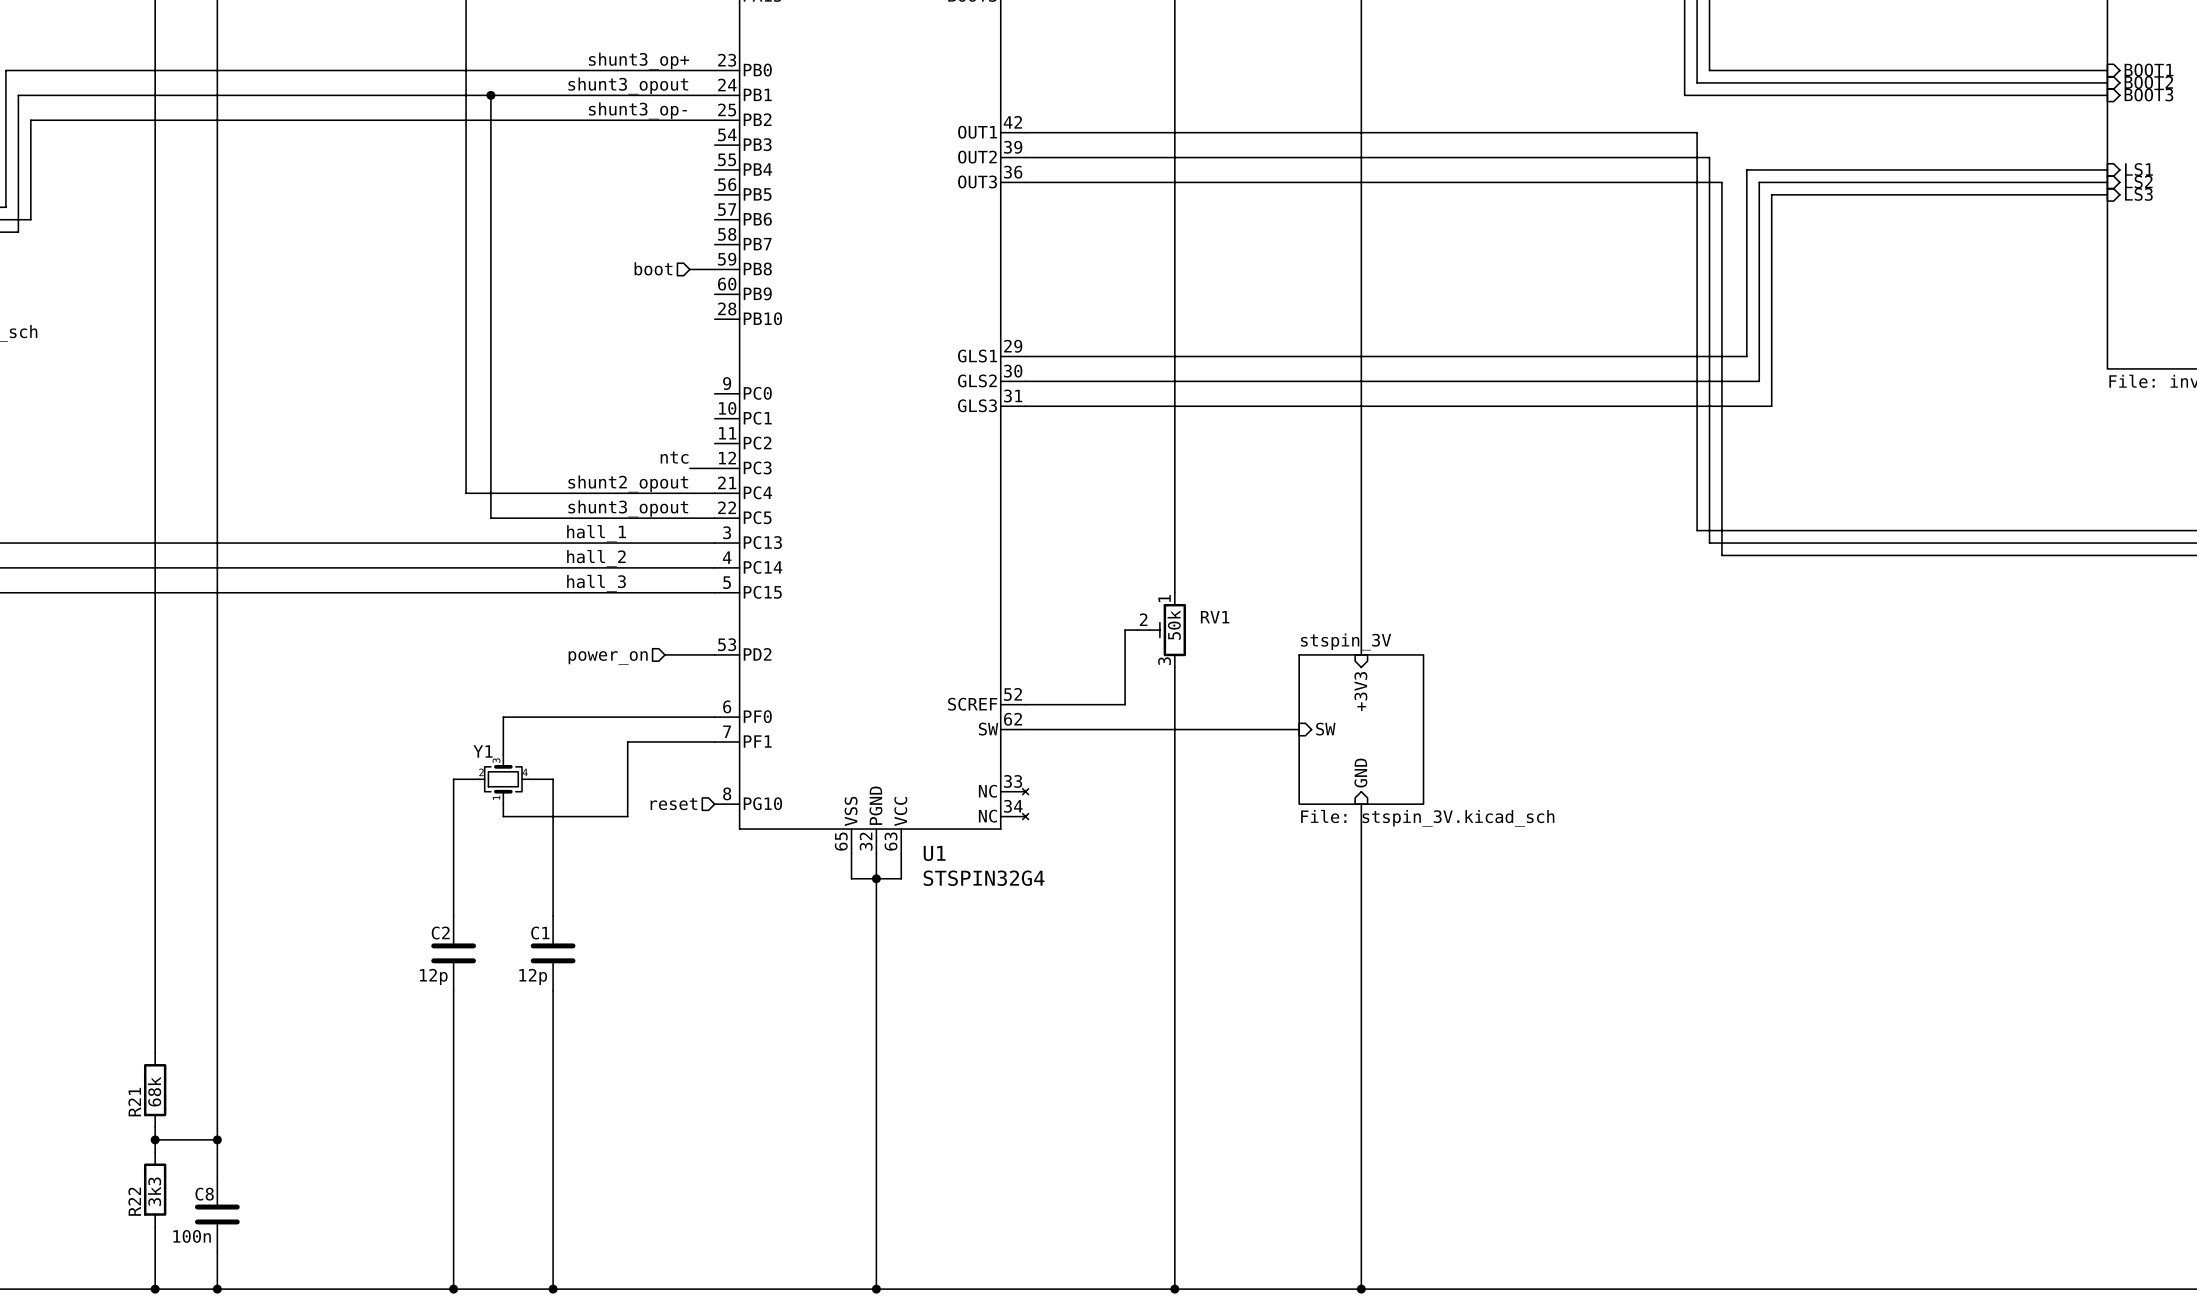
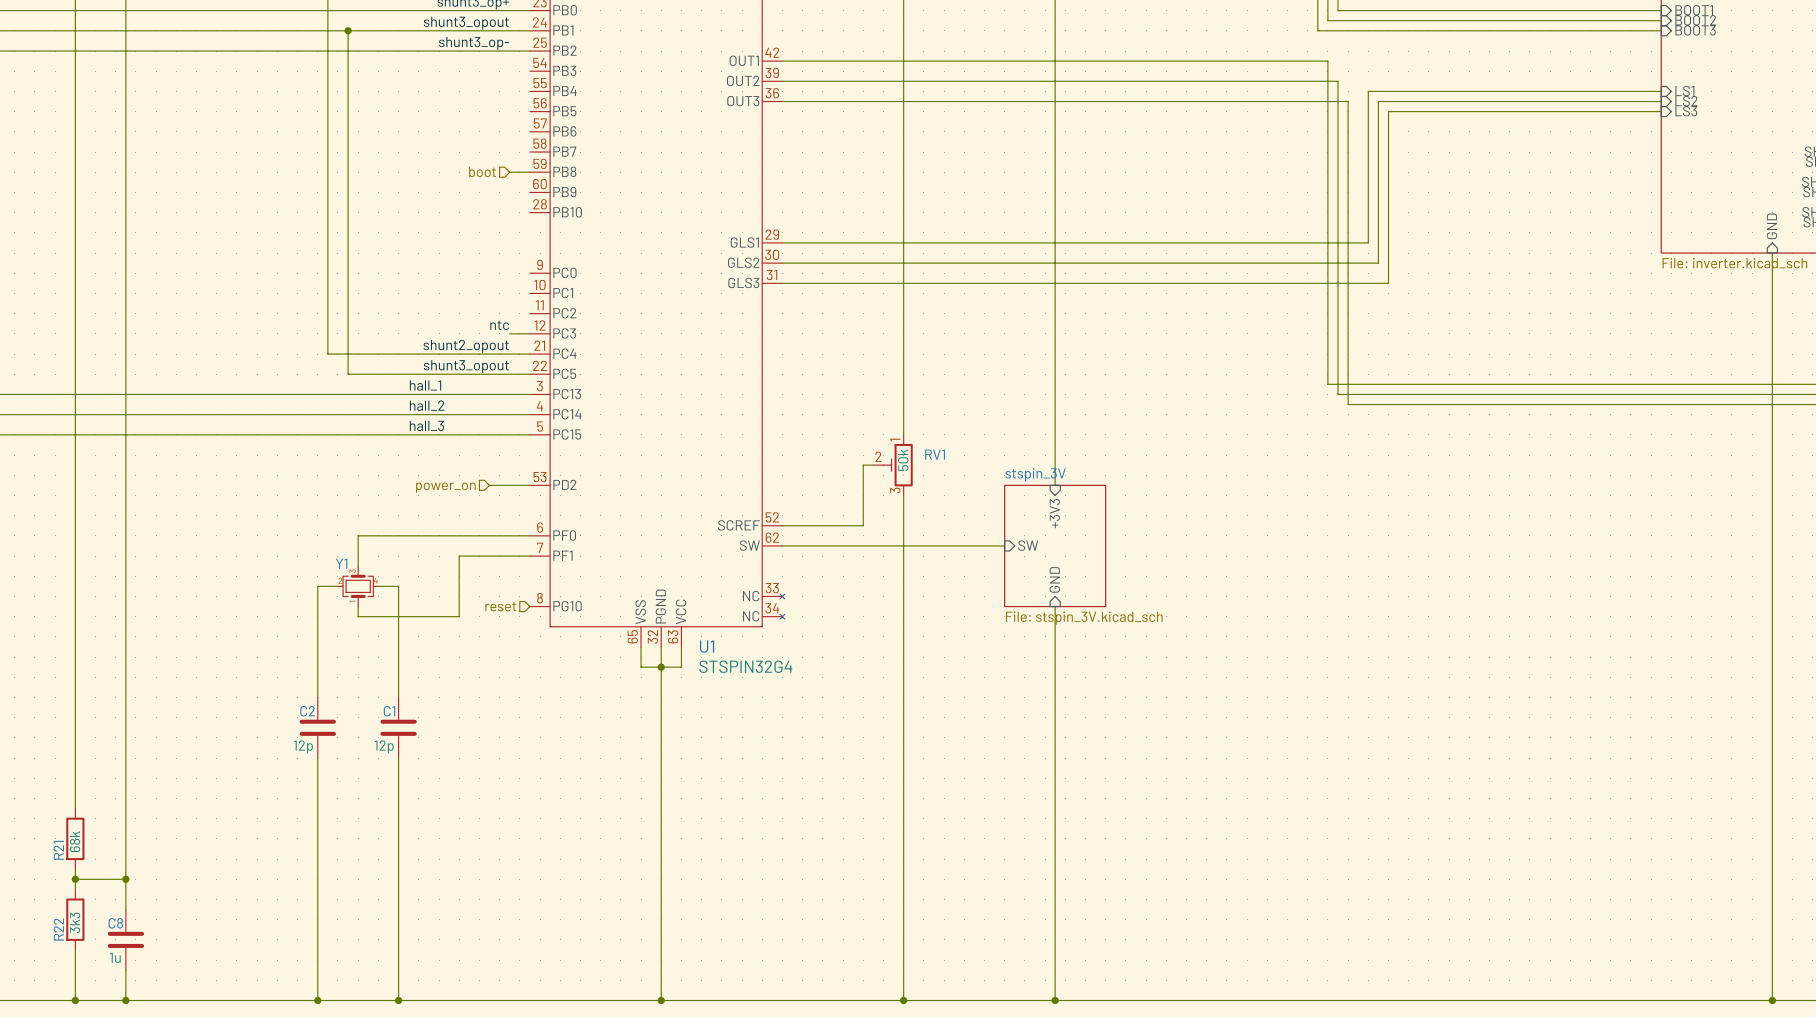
C8 value: 100n (192, 1236) -> 1u (115, 957)

